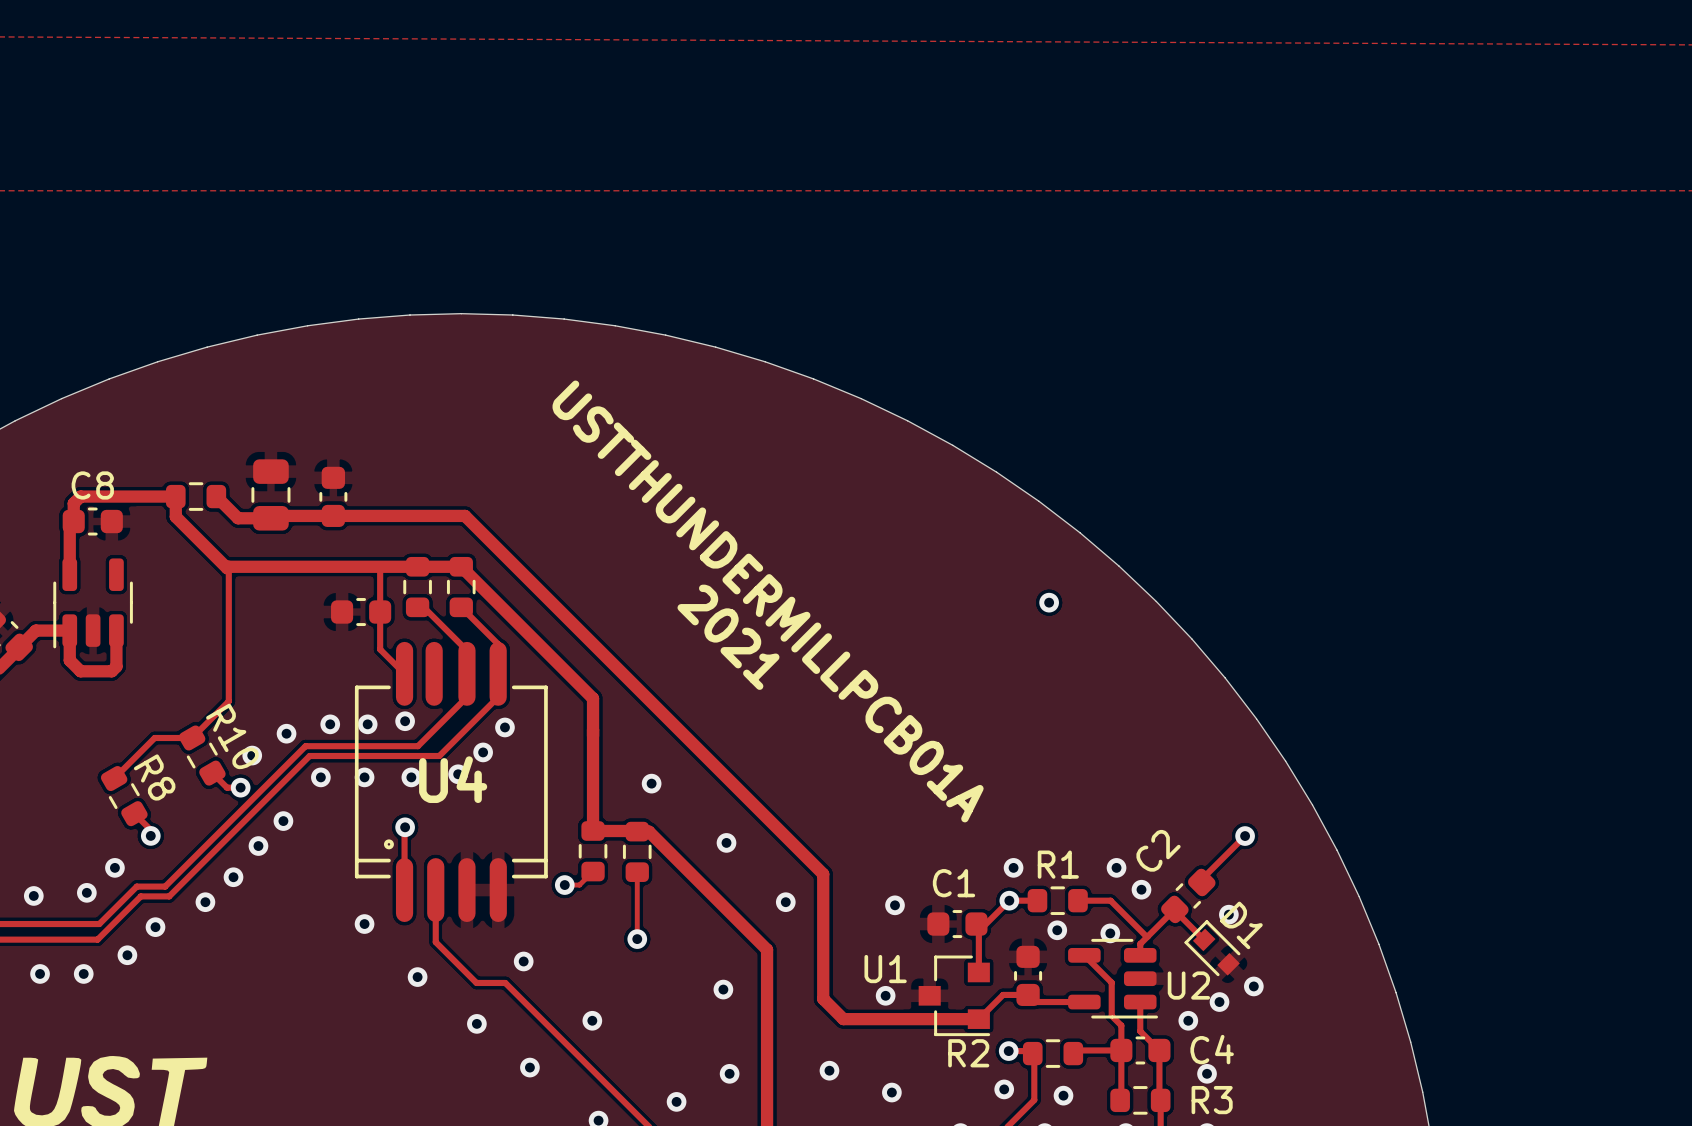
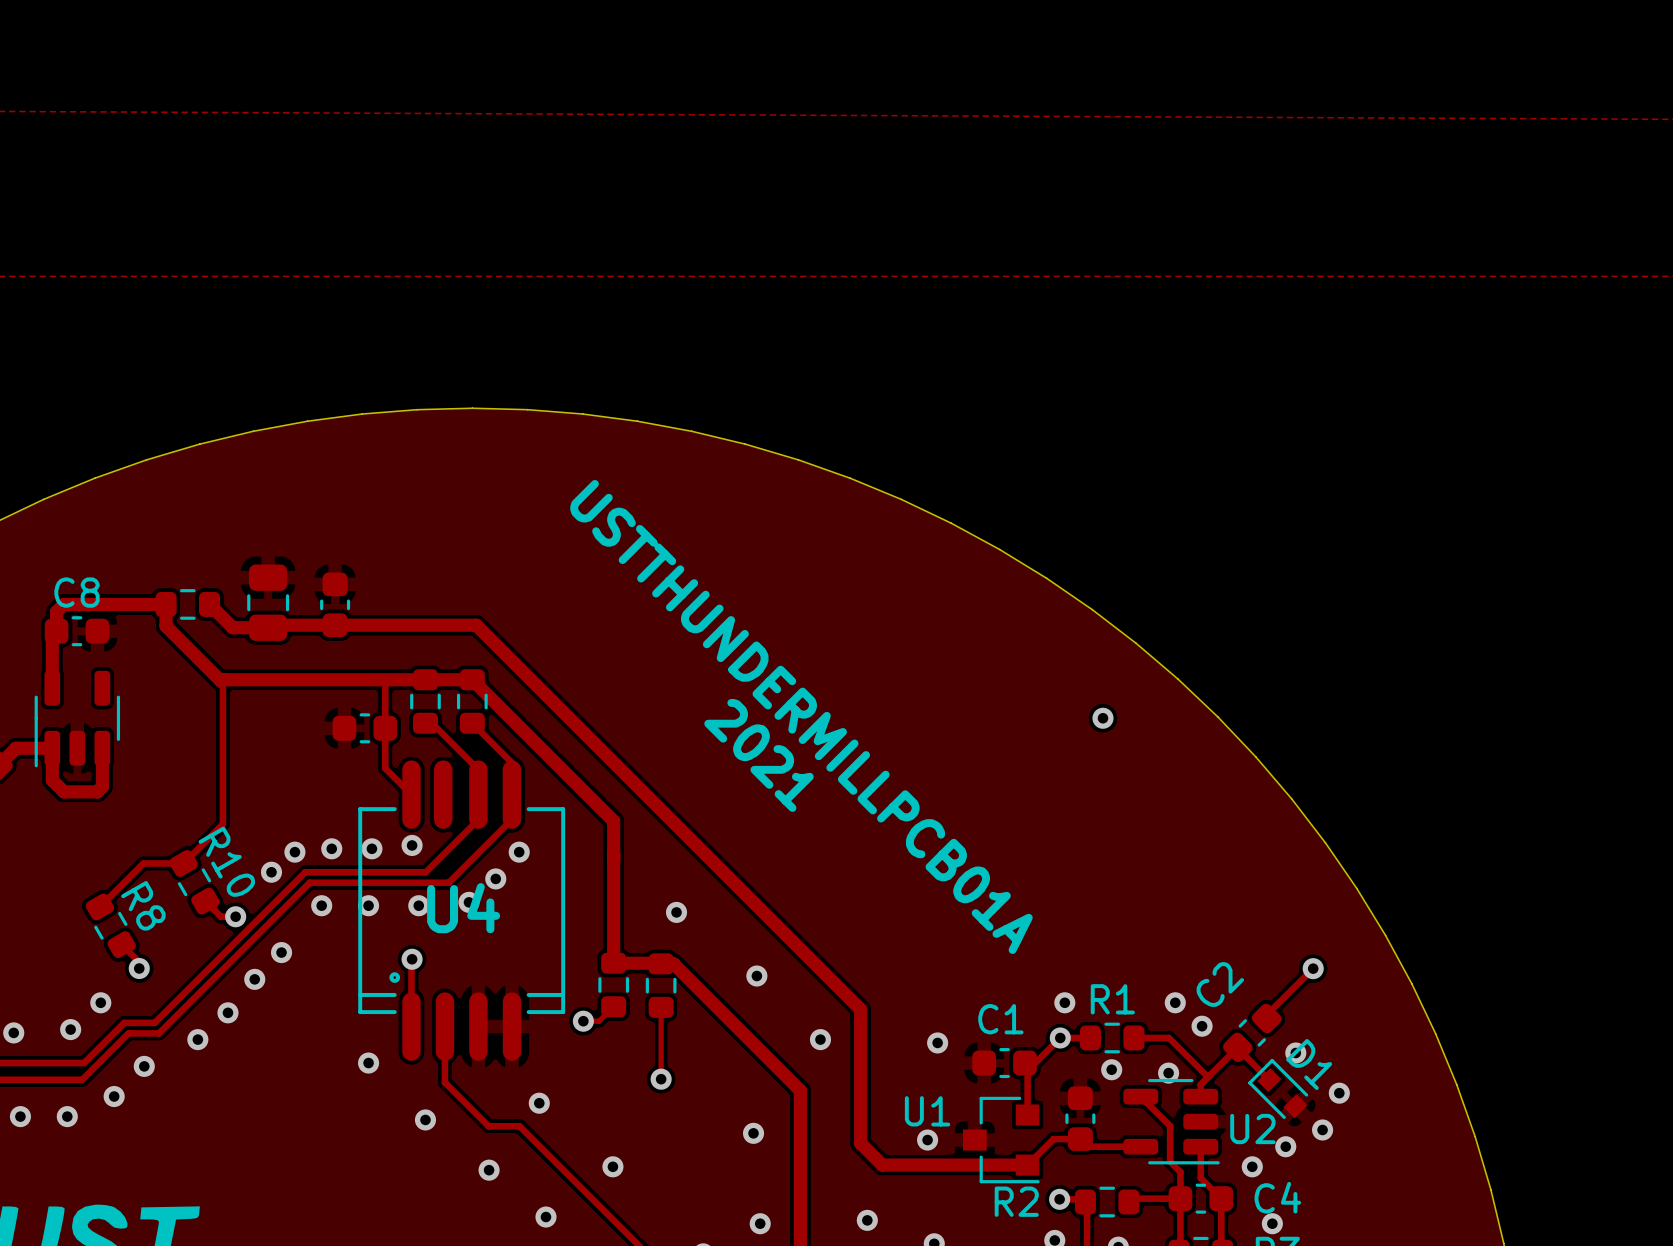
via: none -> (294, 852)
via: (286, 733) -> none
via: none -> (271, 872)
via: (252, 755) -> none
via: none -> (1339, 1093)

